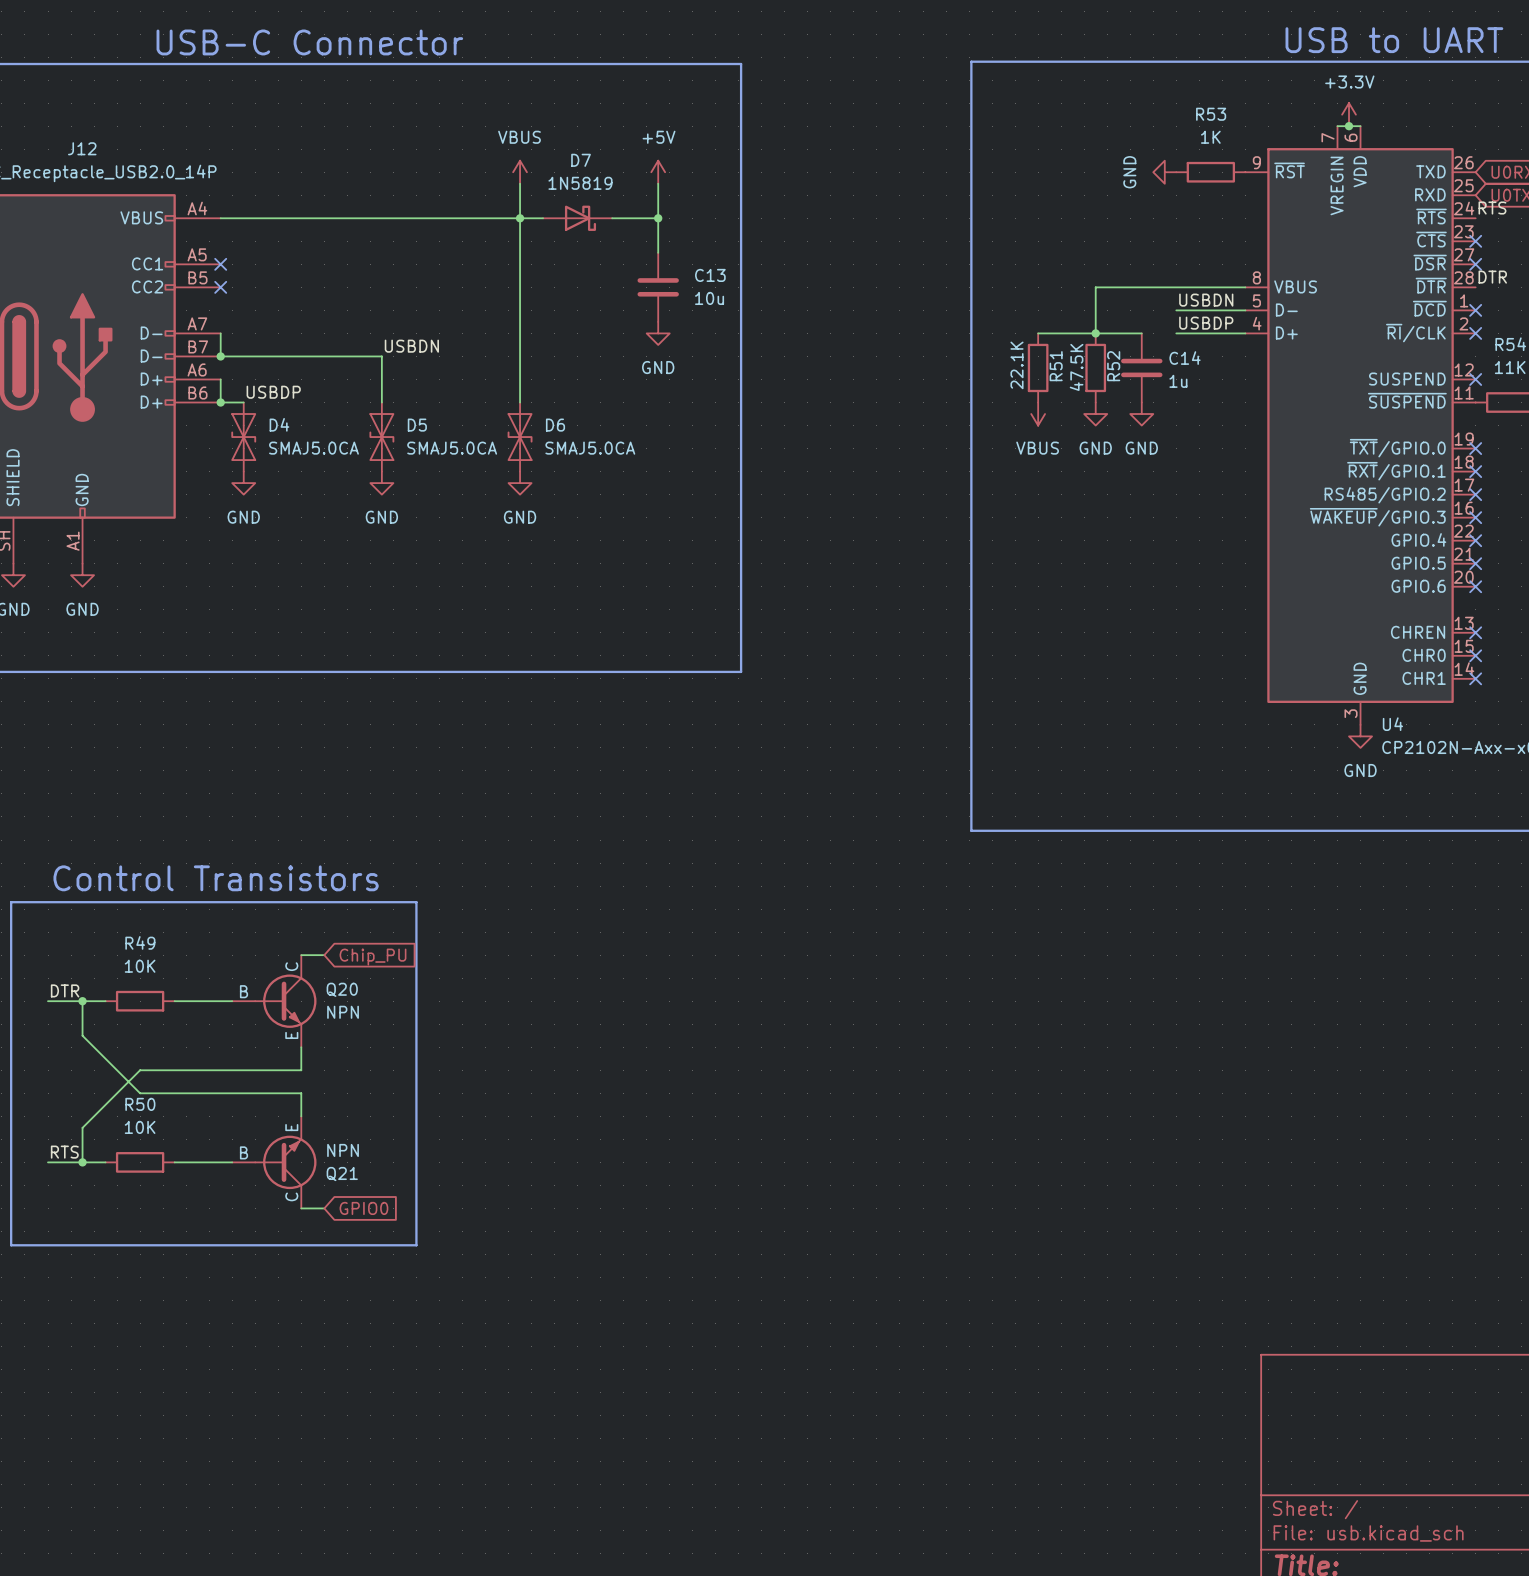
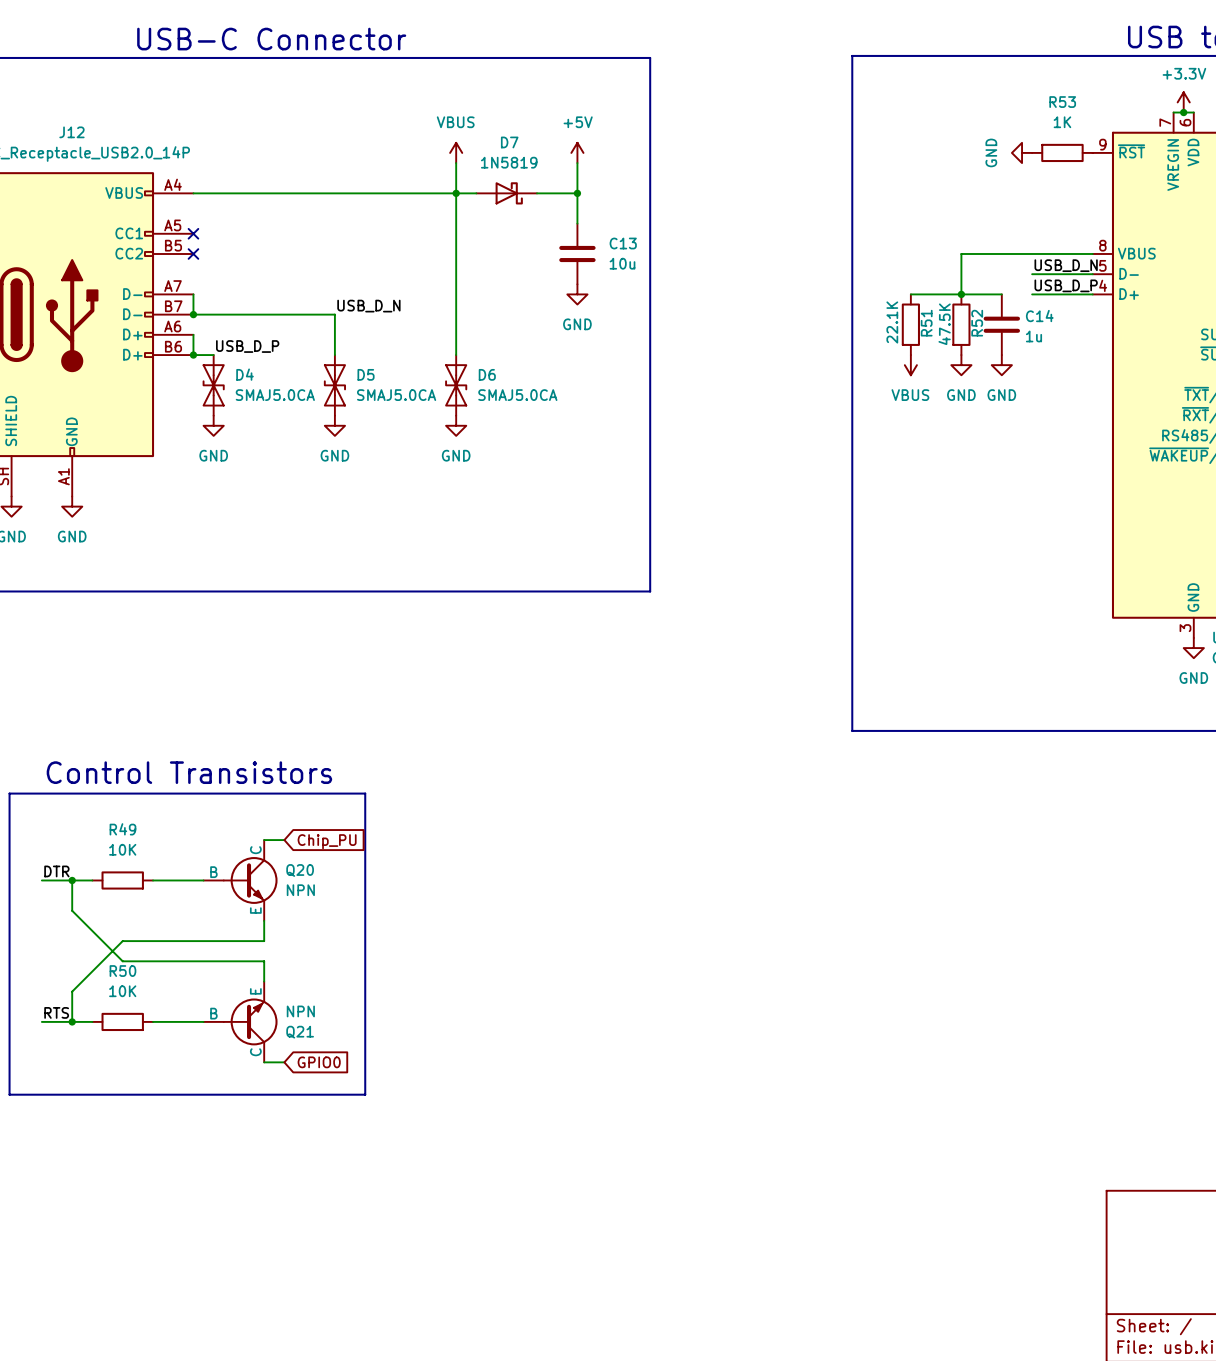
label: USBDN (1206, 300) -> USB_D_N (1066, 265)
label: USBDP (1206, 323) -> USB_D_P (1066, 285)
label: USBDN (411, 346) -> USB_D_N (368, 306)
label: USBDP (273, 392) -> USB_D_P (247, 346)

